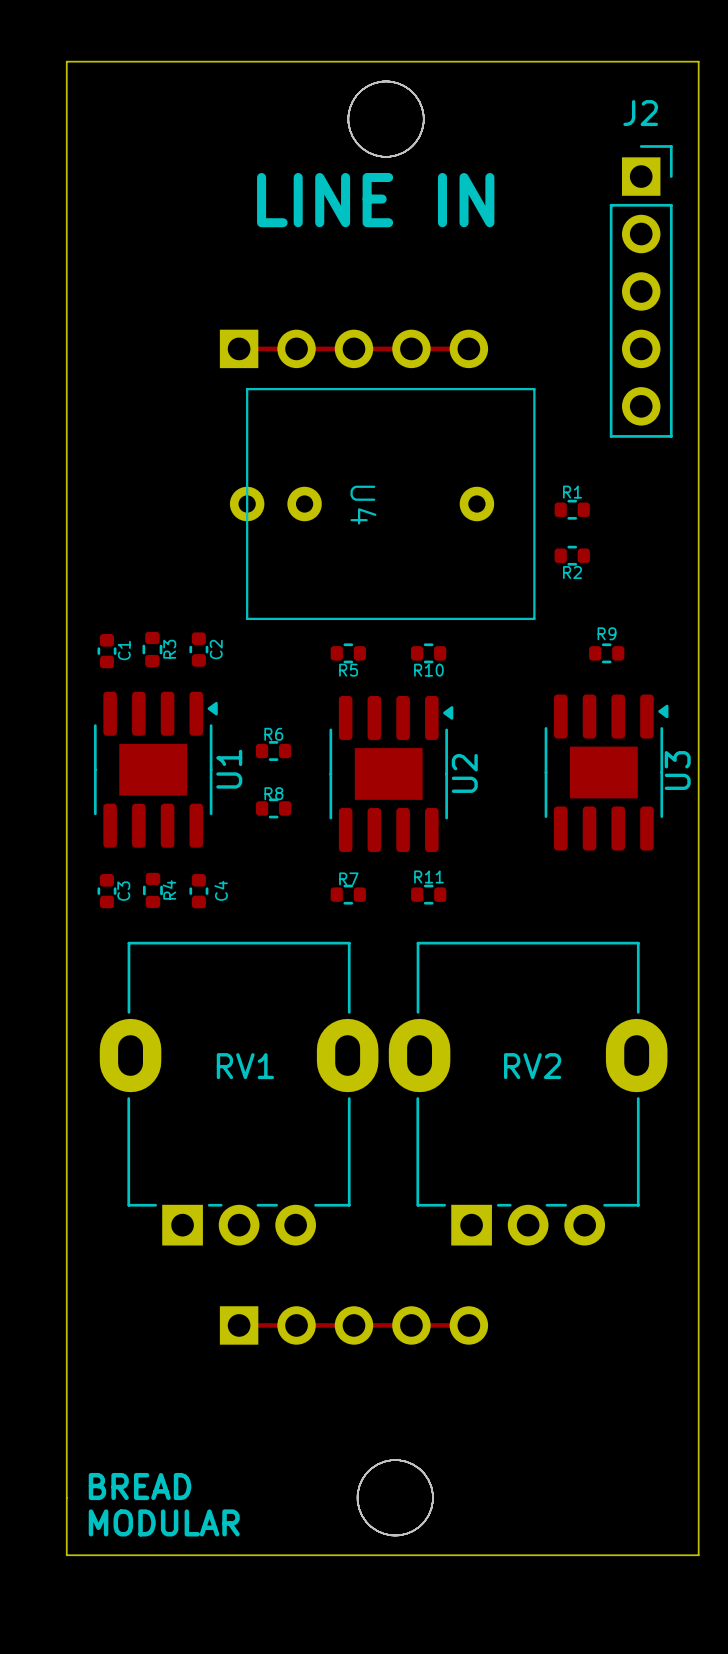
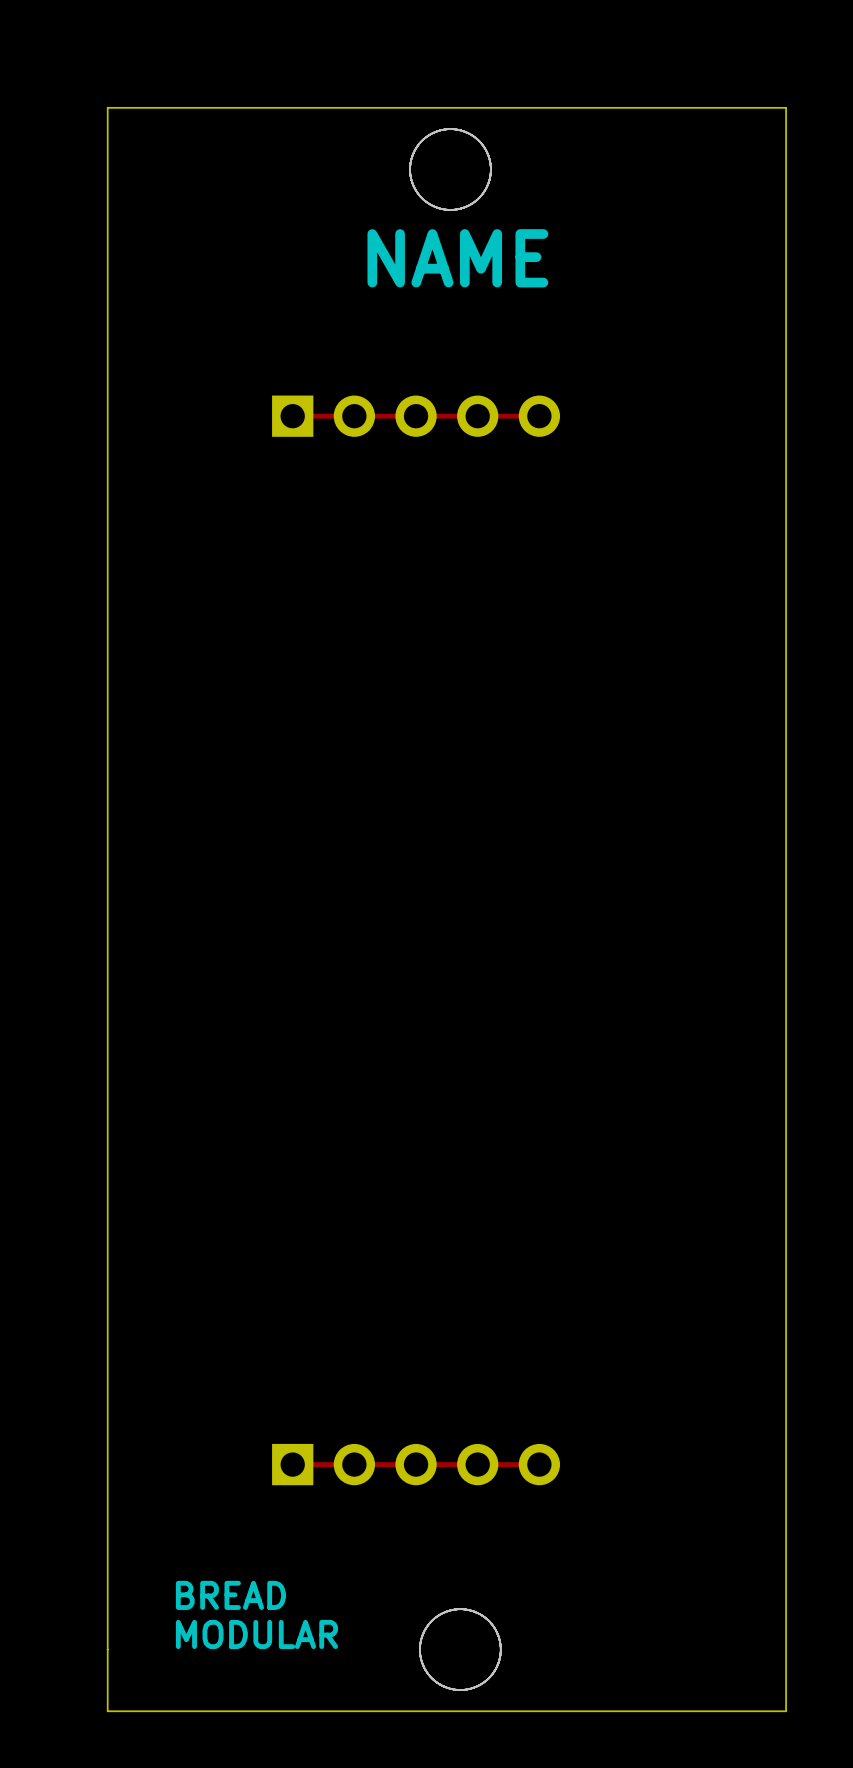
text: LINE IN (375, 200) -> none
text: none -> NAME (457, 258)
J2: (641, 291) -> none
U4: (382, 504) -> none
R1: (572, 509) -> none
R2: (572, 555) -> none
R3: (152, 649) -> none
C2: (198, 649) -> none
C1: (106, 651) -> none
R5: (348, 653) -> none
R10: (428, 653) -> none
R9: (606, 653) -> none
R6: (273, 751) -> none
U1: (155, 769) -> none
U3: (606, 772) -> none
U2: (391, 773) -> none
R8: (273, 808) -> none
R4: (152, 890) -> none
C3: (106, 891) -> none
C4: (198, 891) -> none
R7: (348, 894) -> none
R11: (428, 894) -> none
RV1: (239, 1093) -> none
RV2: (528, 1093) -> none
text position: BREAD (140, 1486) -> BREAD (230, 1595)
text position: MODULAR (164, 1522) -> MODULAR (256, 1634)

